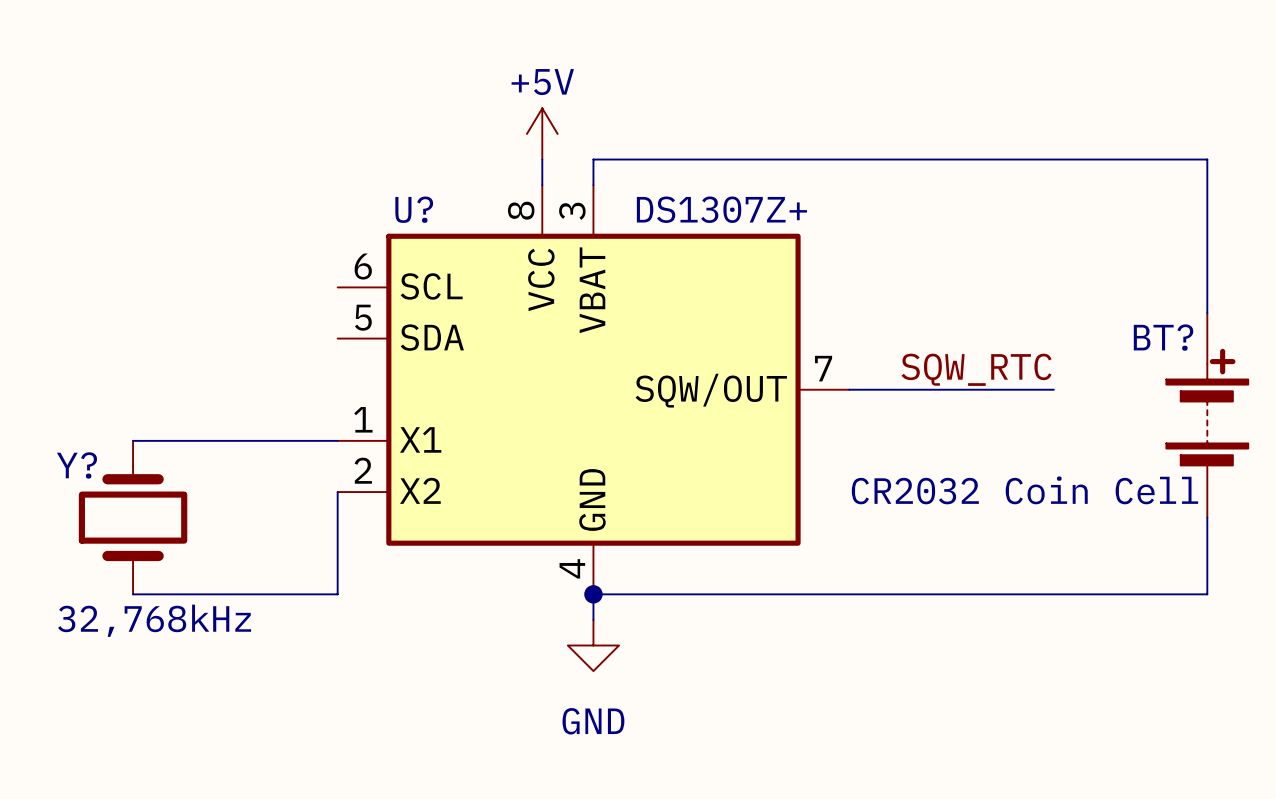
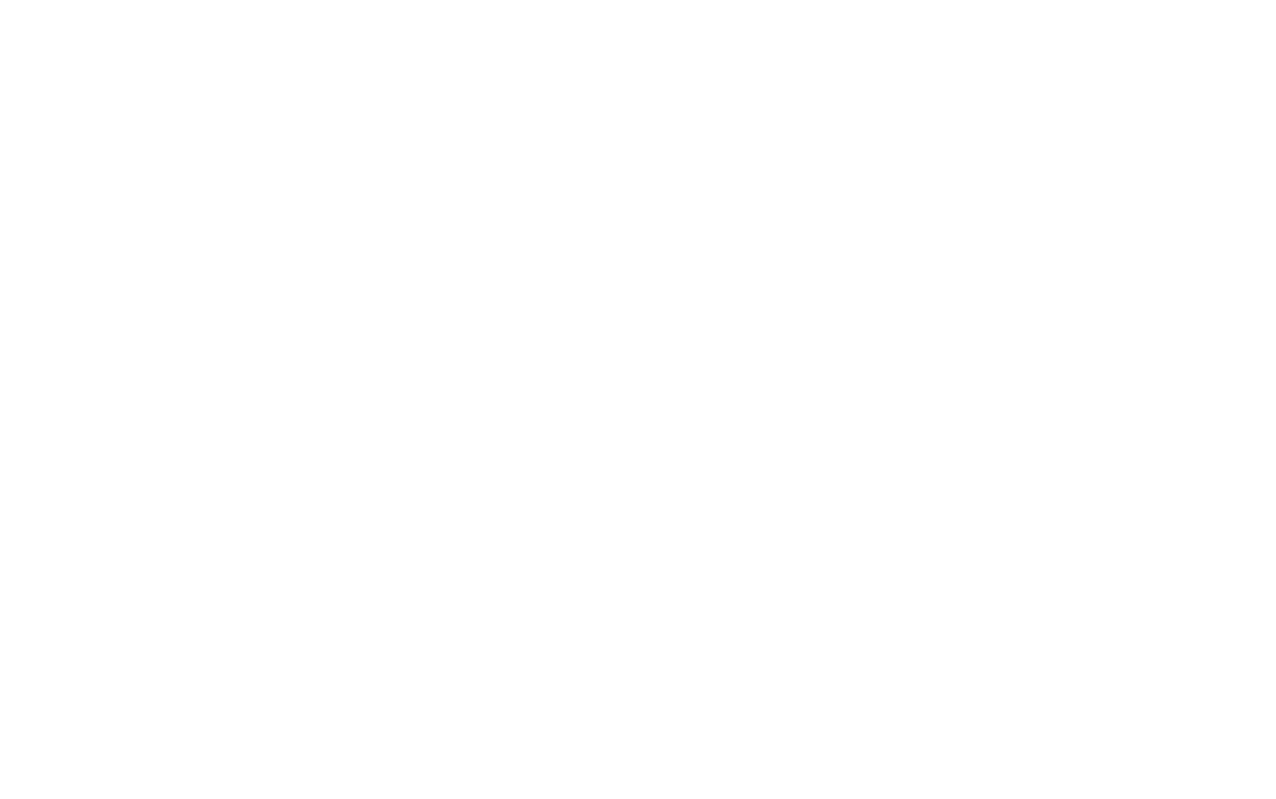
power symbol: +5V (542, 133) -> none
wire: (542, 159) (542, 185) -> none
wire: (593, 185) (593, 159) (1207, 159) (1207, 312) -> none
label: SQW_RTC (976, 369) -> none
U?: DS1307Z+ (593, 389) -> none
wire: (849, 389) (1053, 389) -> none
BT?: CR2032 Coin Cell (1207, 415) -> none
wire: (133, 440) (337, 440) -> none
wire: (337, 492) (337, 594) (133, 594) -> none
Y?: 32,768kHz (133, 517) -> none
wire: (1207, 517) (1207, 594) (593, 594) (593, 619) -> none
junction: (593, 594) -> none
power symbol: GND (593, 645) -> none

